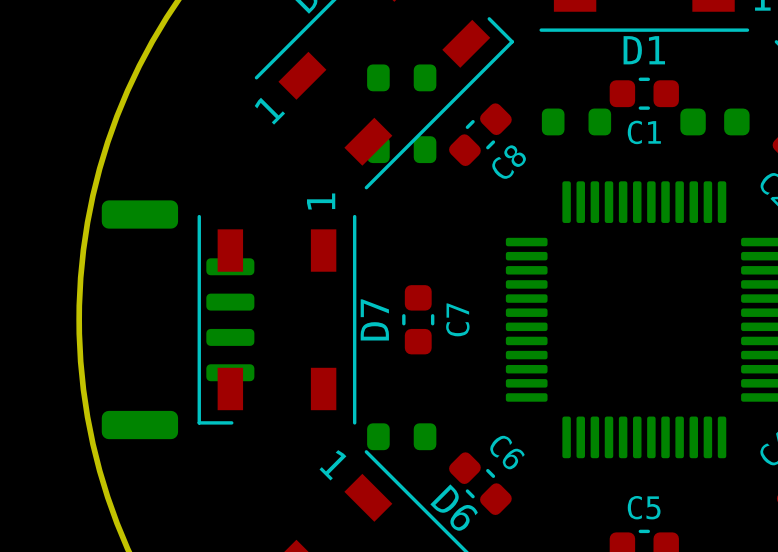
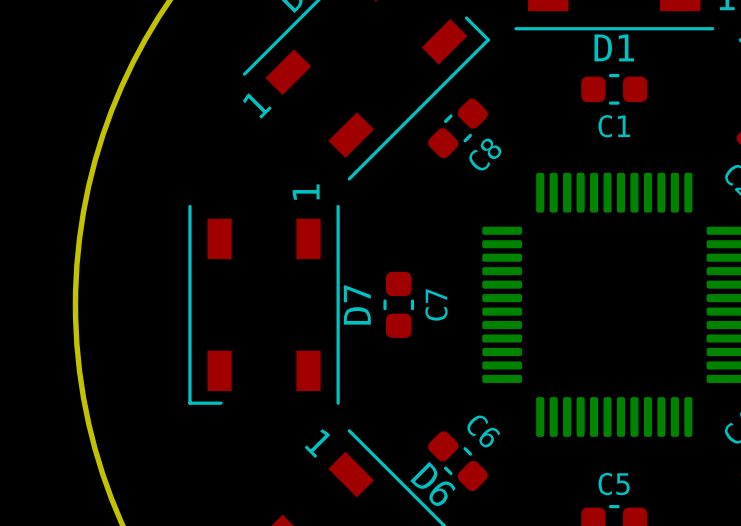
part: (401, 77) -> none
part: (576, 121) -> none
part: (714, 121) -> none
part: (401, 149) -> none
part: (178, 319) -> none
part: (401, 436) -> none

